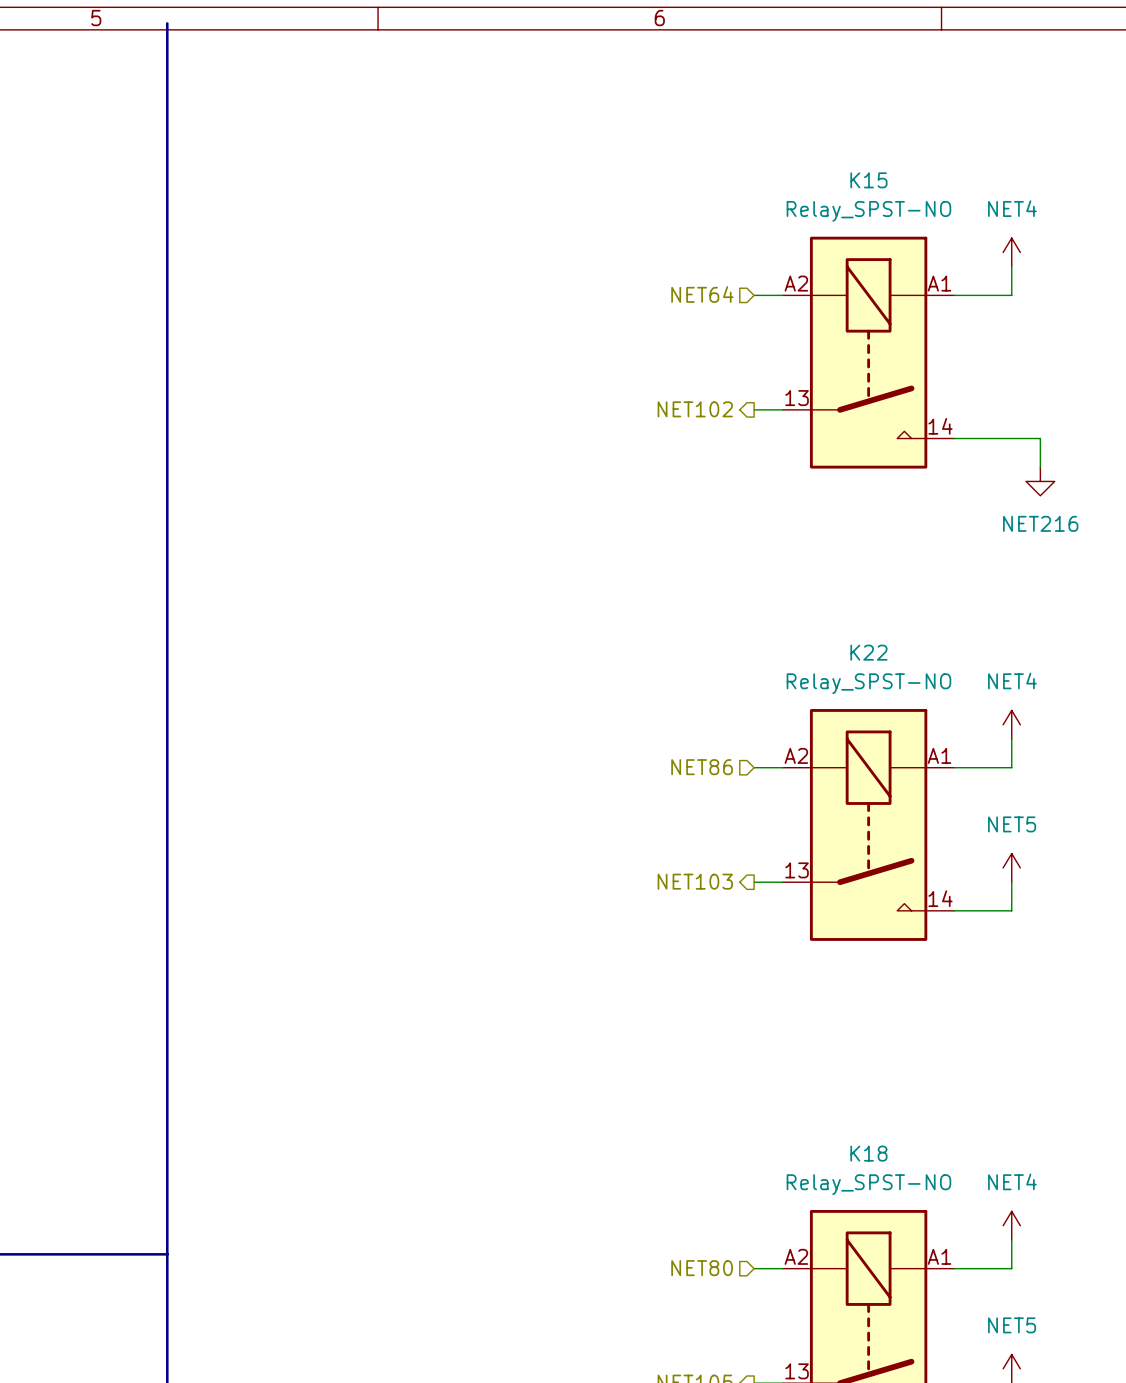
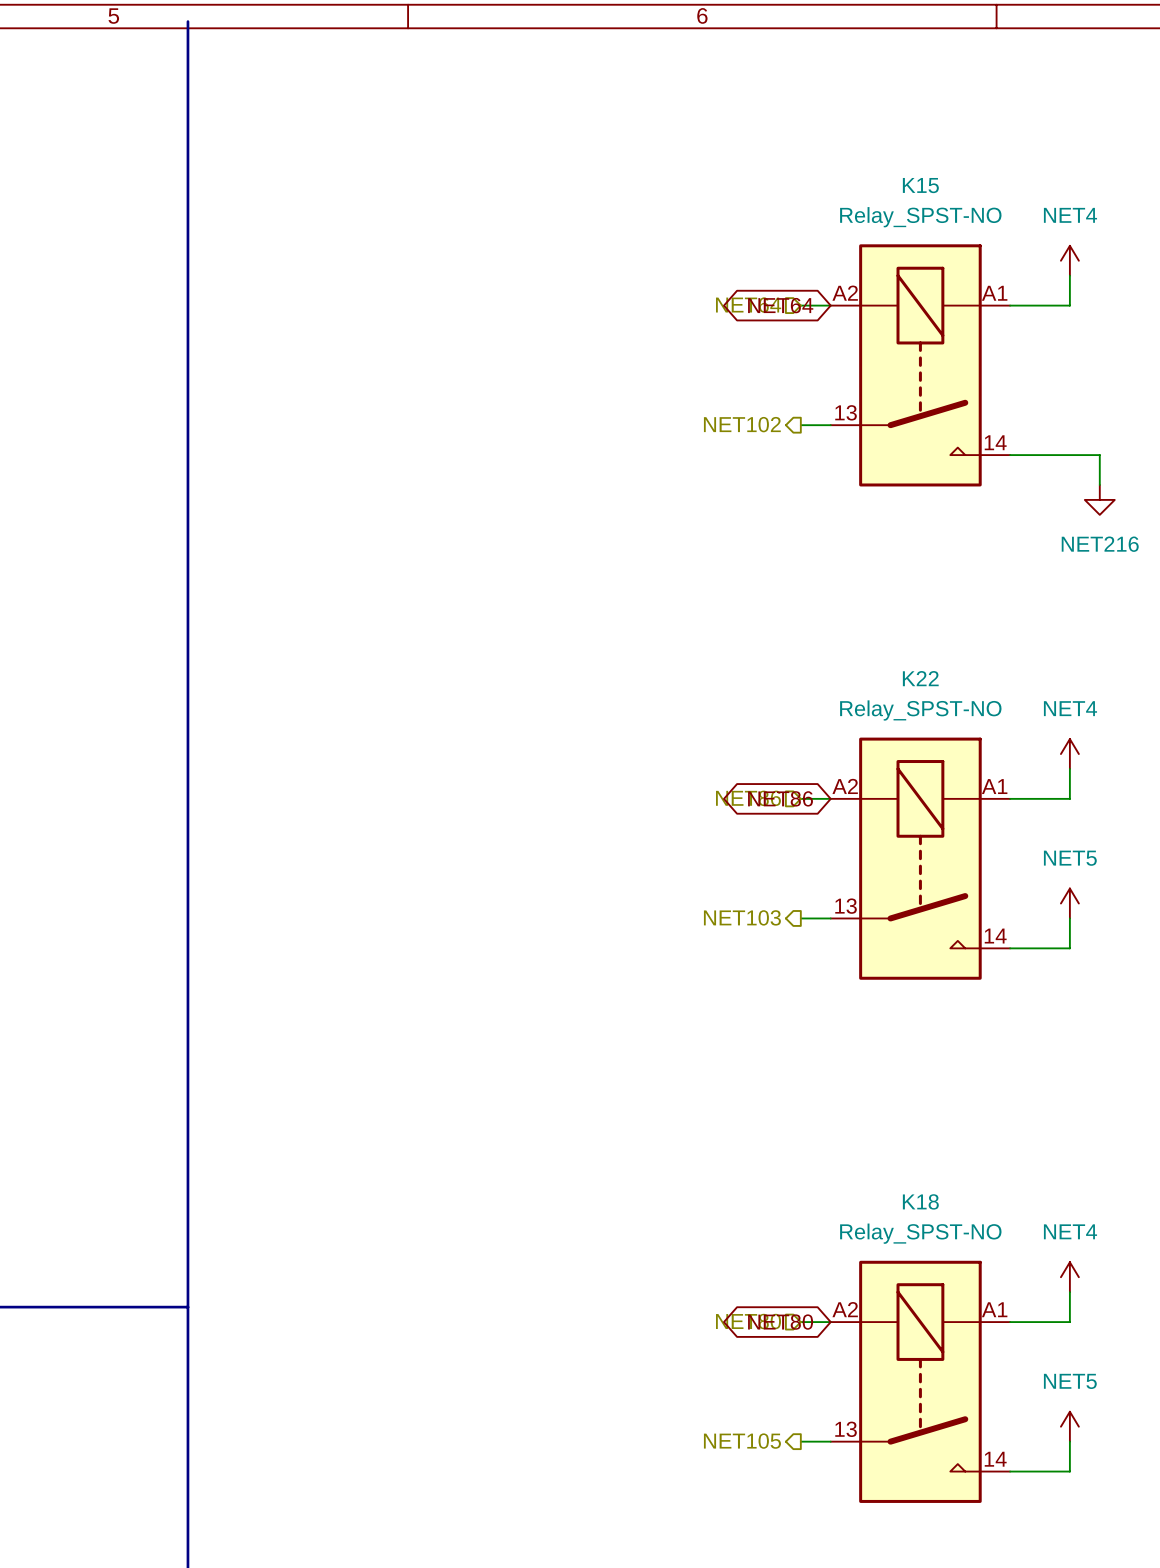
global label: none -> NET64 (780, 305)
global label: none -> NET86 (780, 798)
global label: none -> NET80 (780, 1322)

